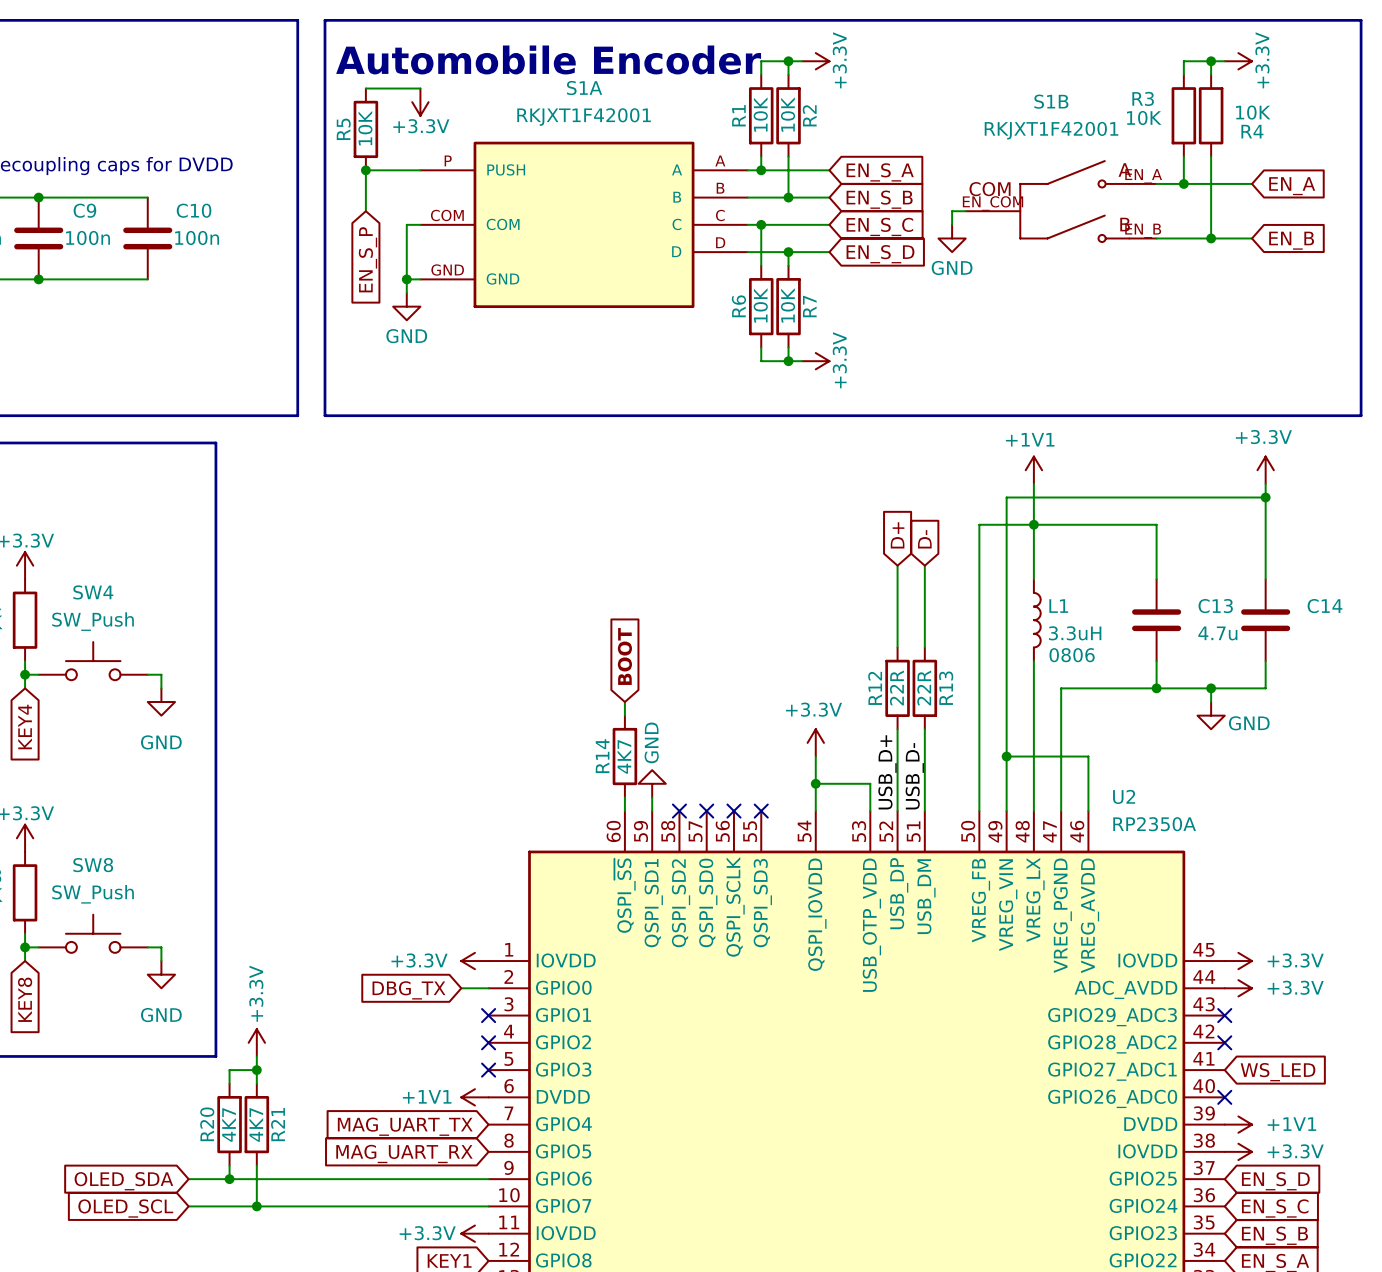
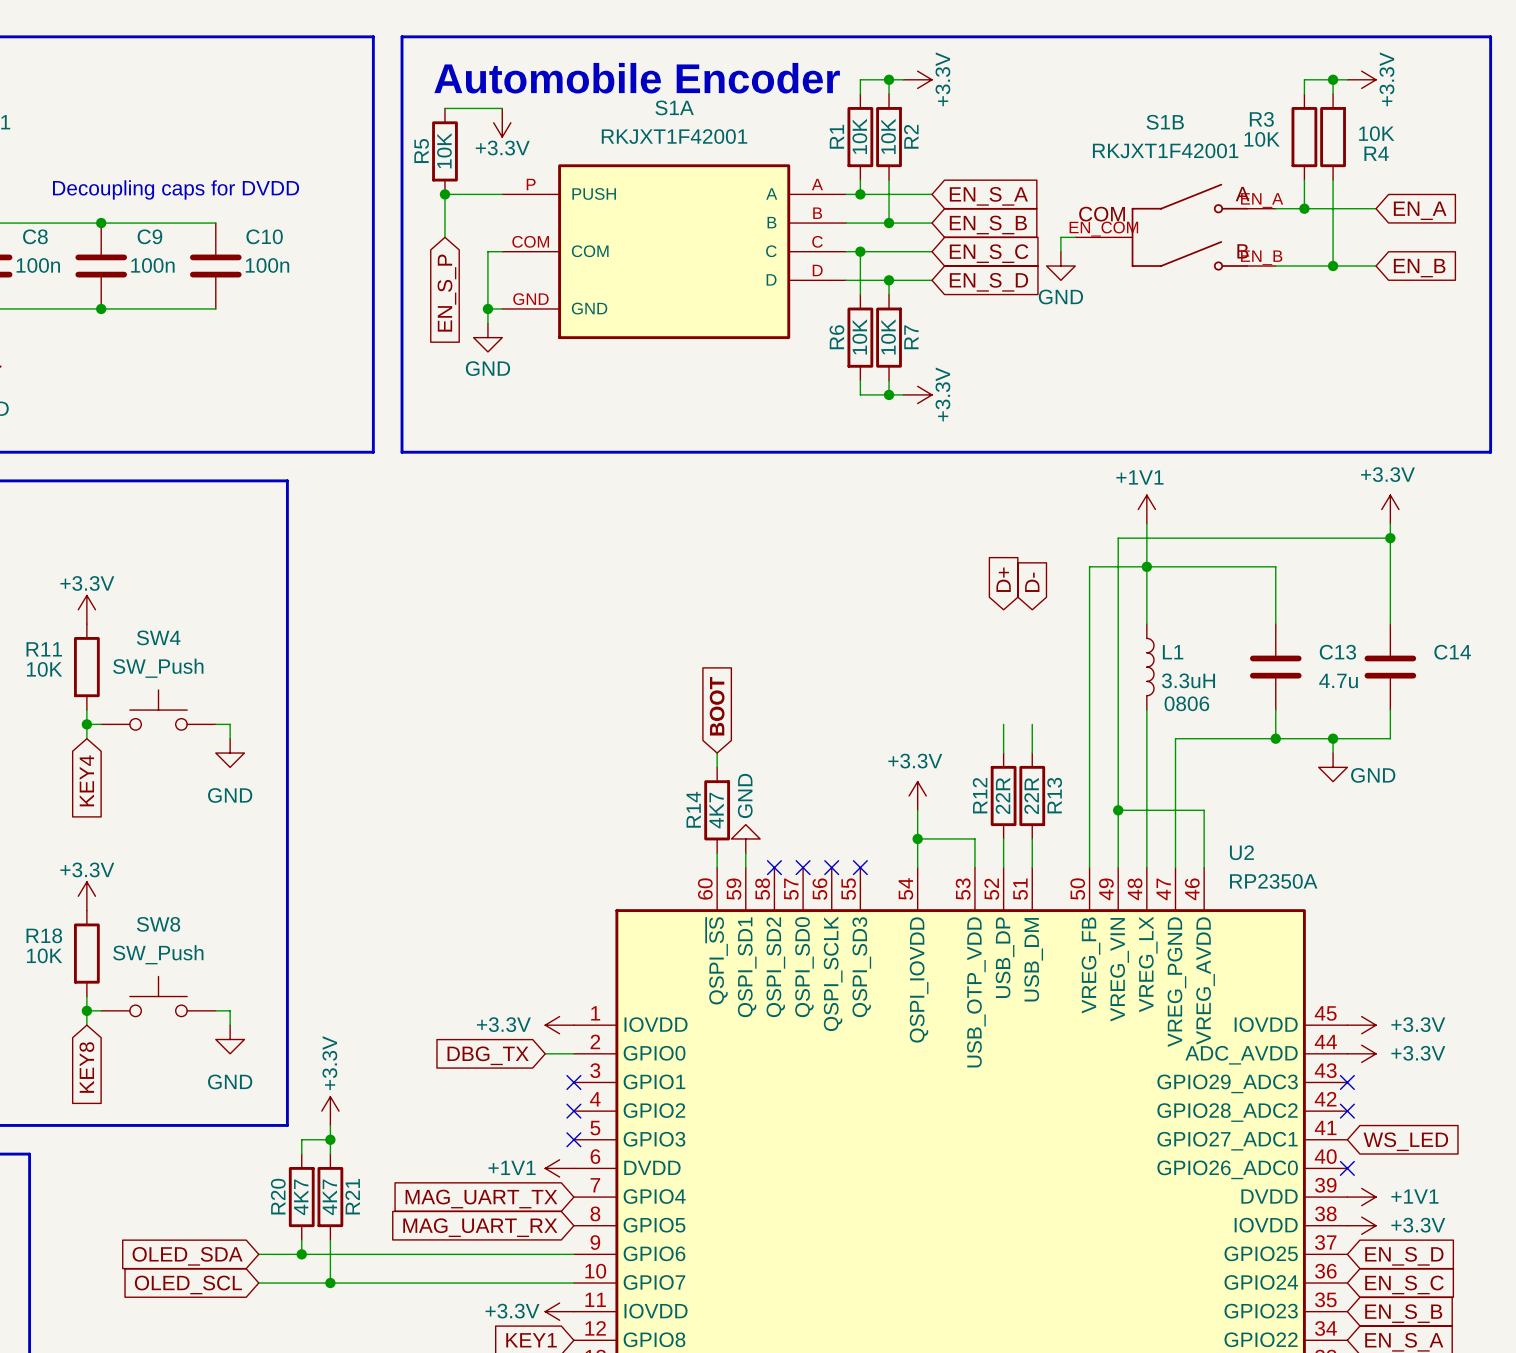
wire: (897, 565) (897, 647) -> none
wire: (924, 565) (924, 647) -> none
wire: none -> (1003, 724) (1003, 753)
wire: none -> (1032, 724) (1032, 753)
R12 position: (897, 688) -> (1003, 796)
R13 position: (924, 688) -> (1032, 796)
wire: (897, 729) (897, 783) -> none
wire: (924, 729) (924, 783) -> none
label: USB_D+ (887, 772) -> none
label: USB_D- (914, 776) -> none

